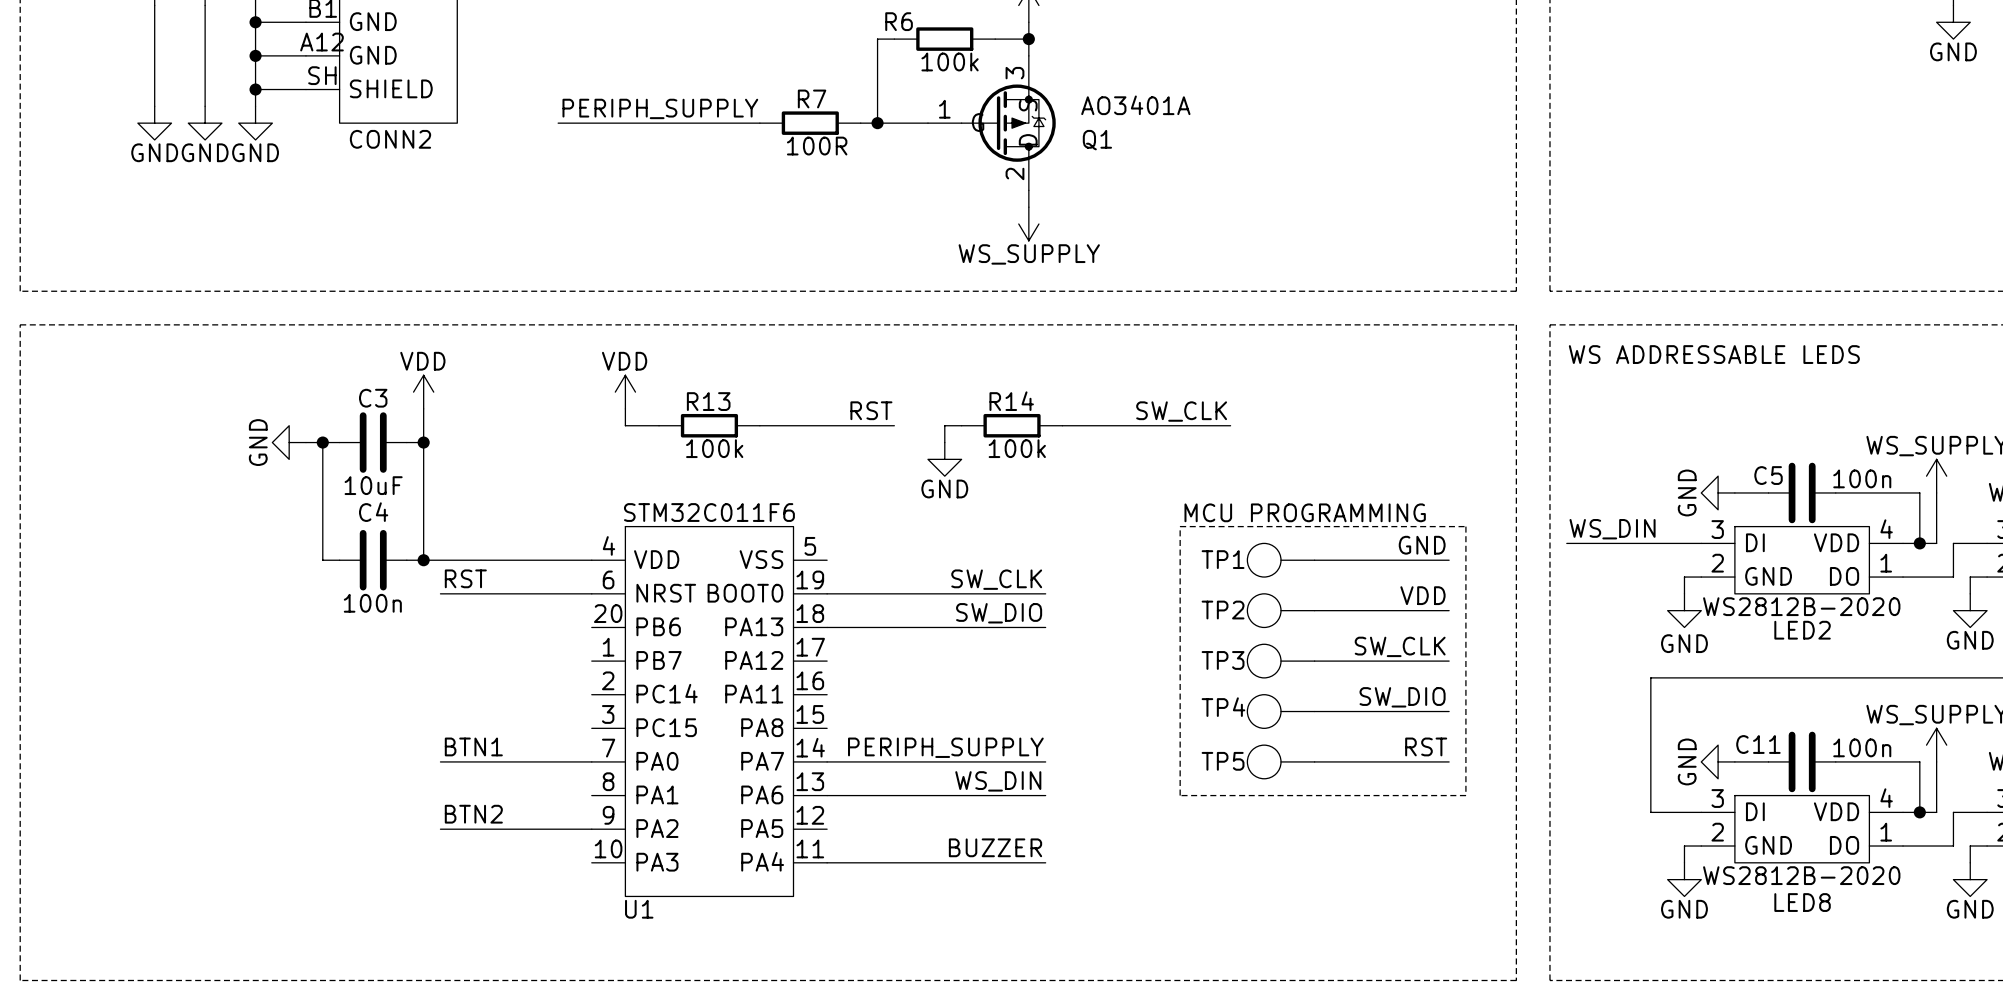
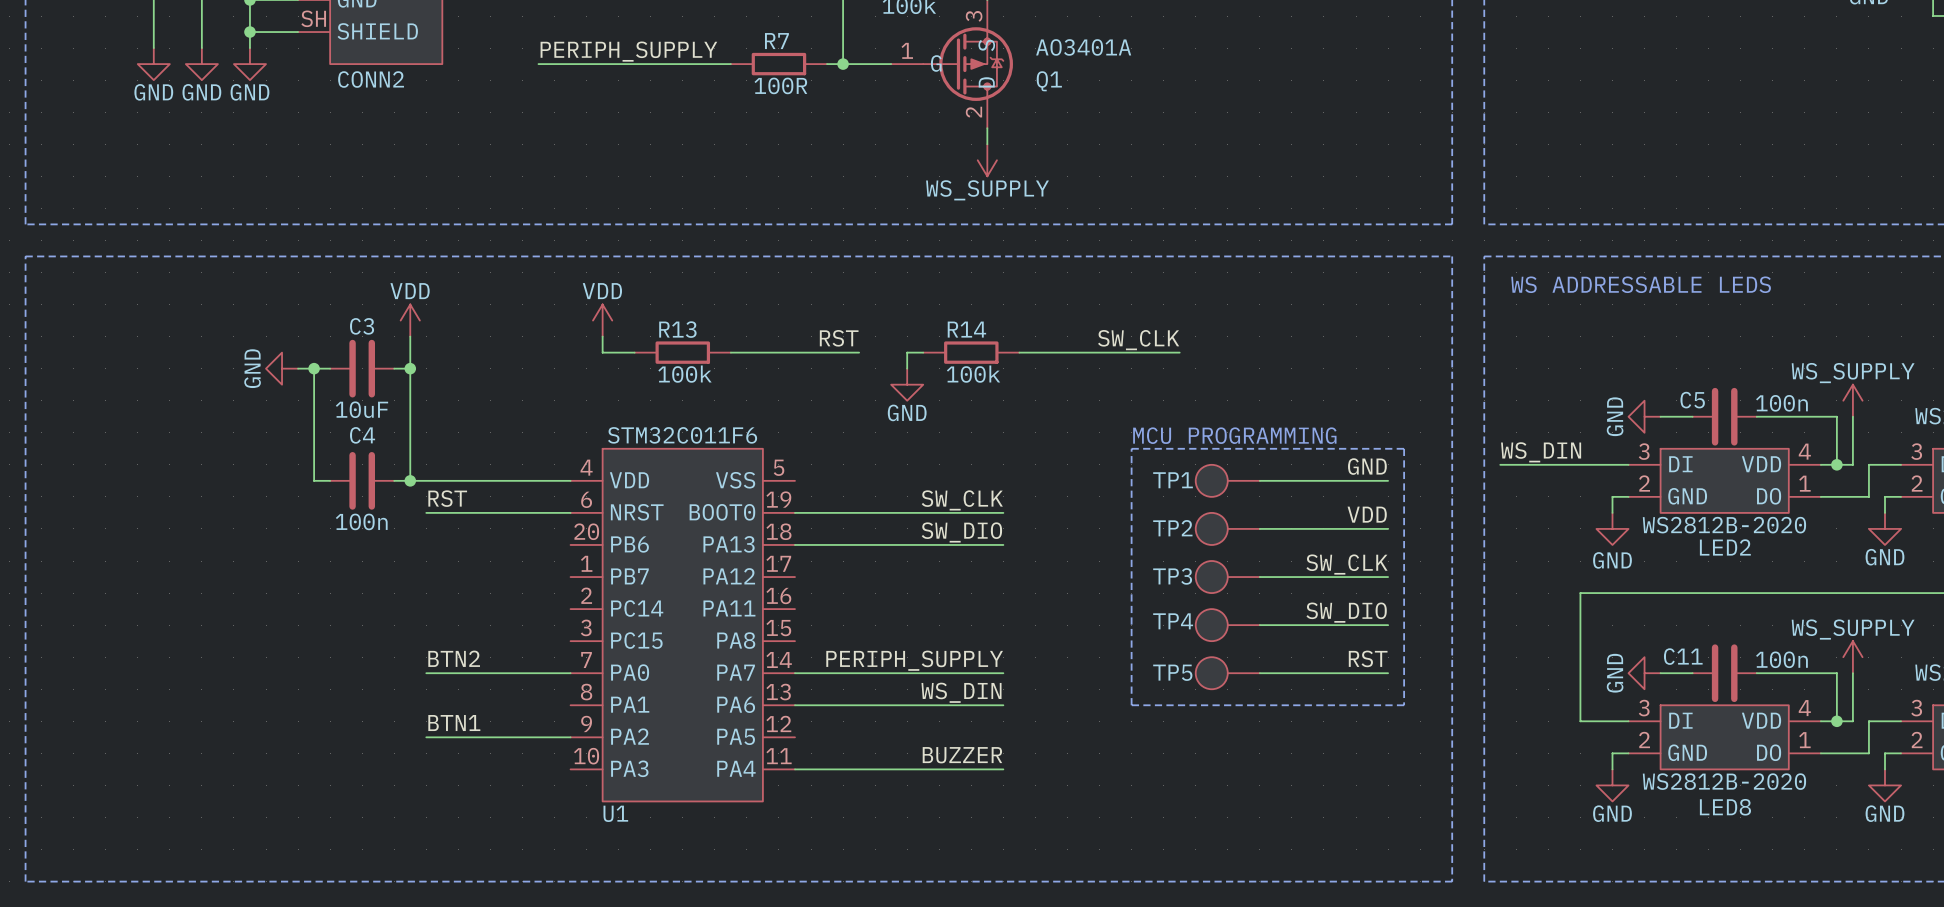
label: BTN1 (473, 746) -> BTN2 (454, 658)
label: BTN2 (473, 814) -> BTN1 (454, 723)

